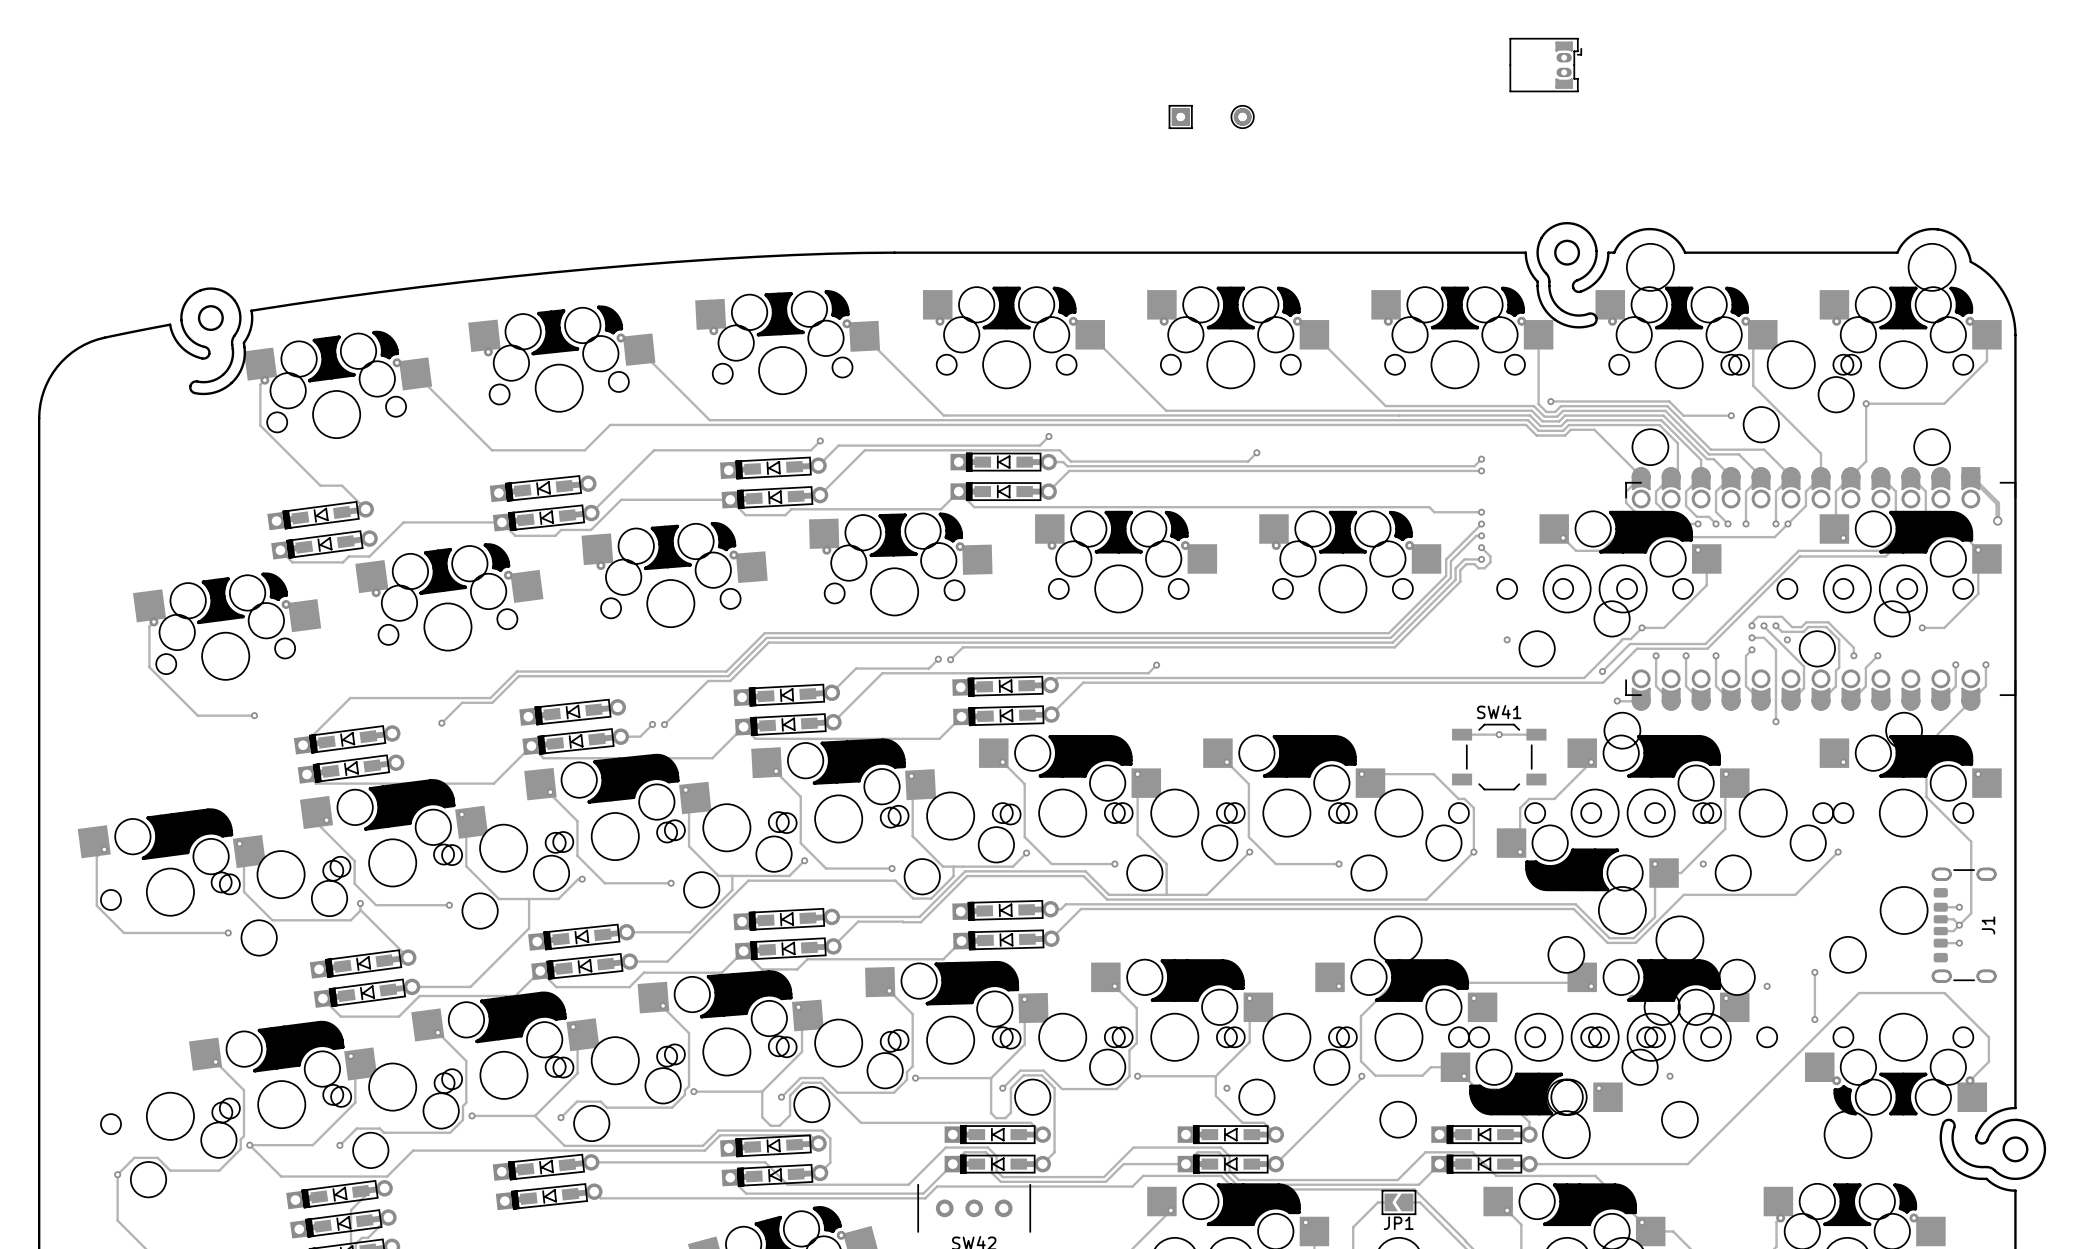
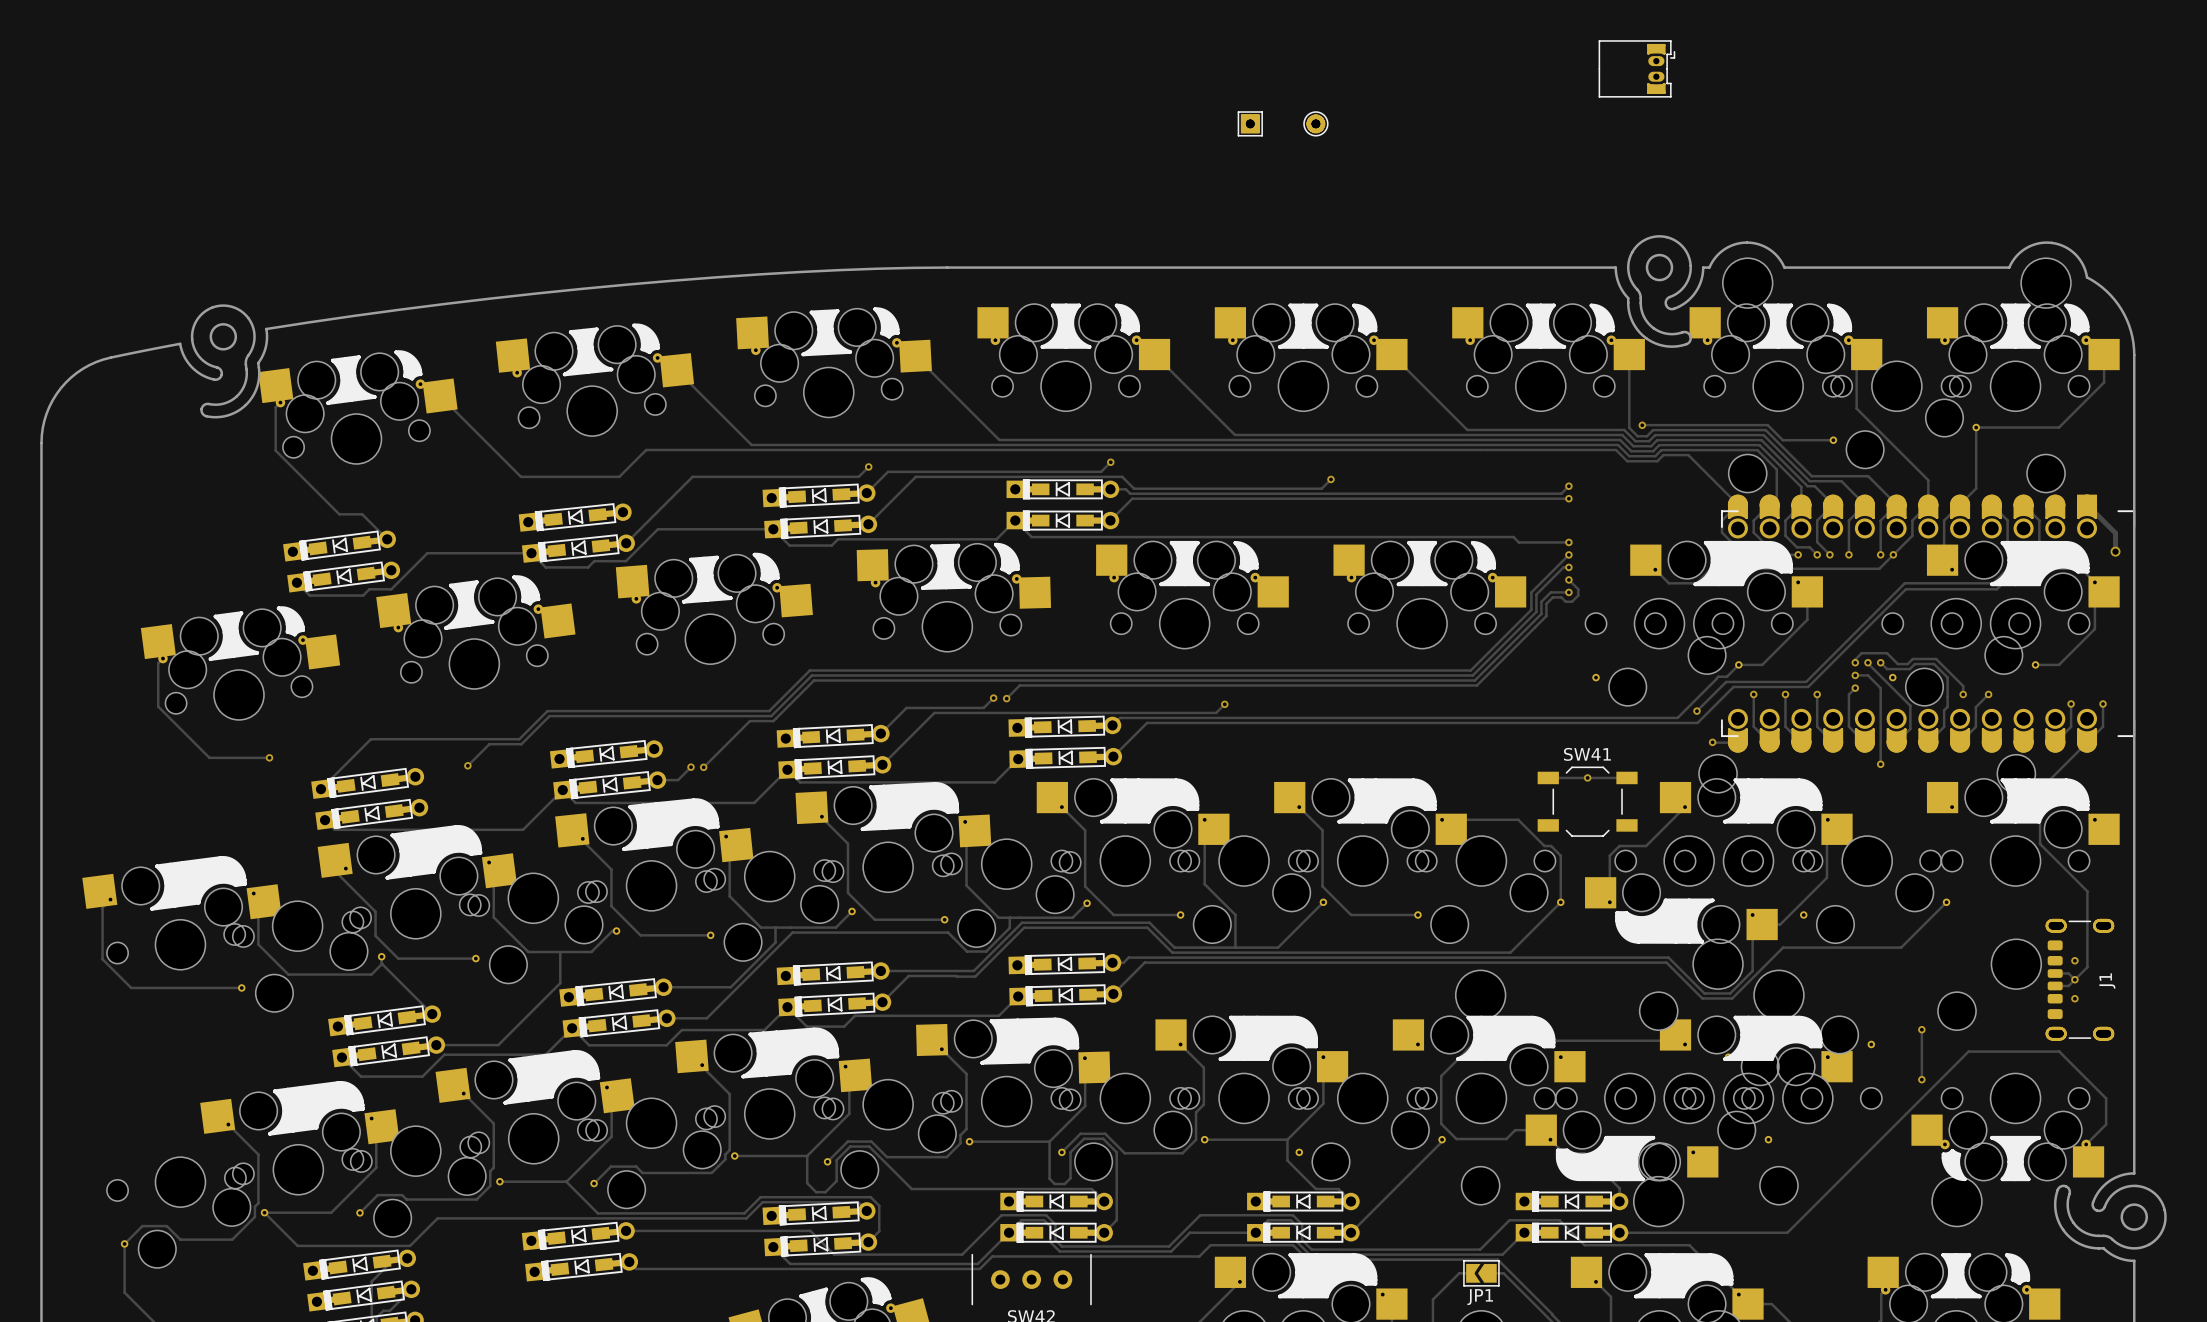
track: (1959, 907) (1940, 907) -> none
track: (1959, 943) (1940, 943) -> none

